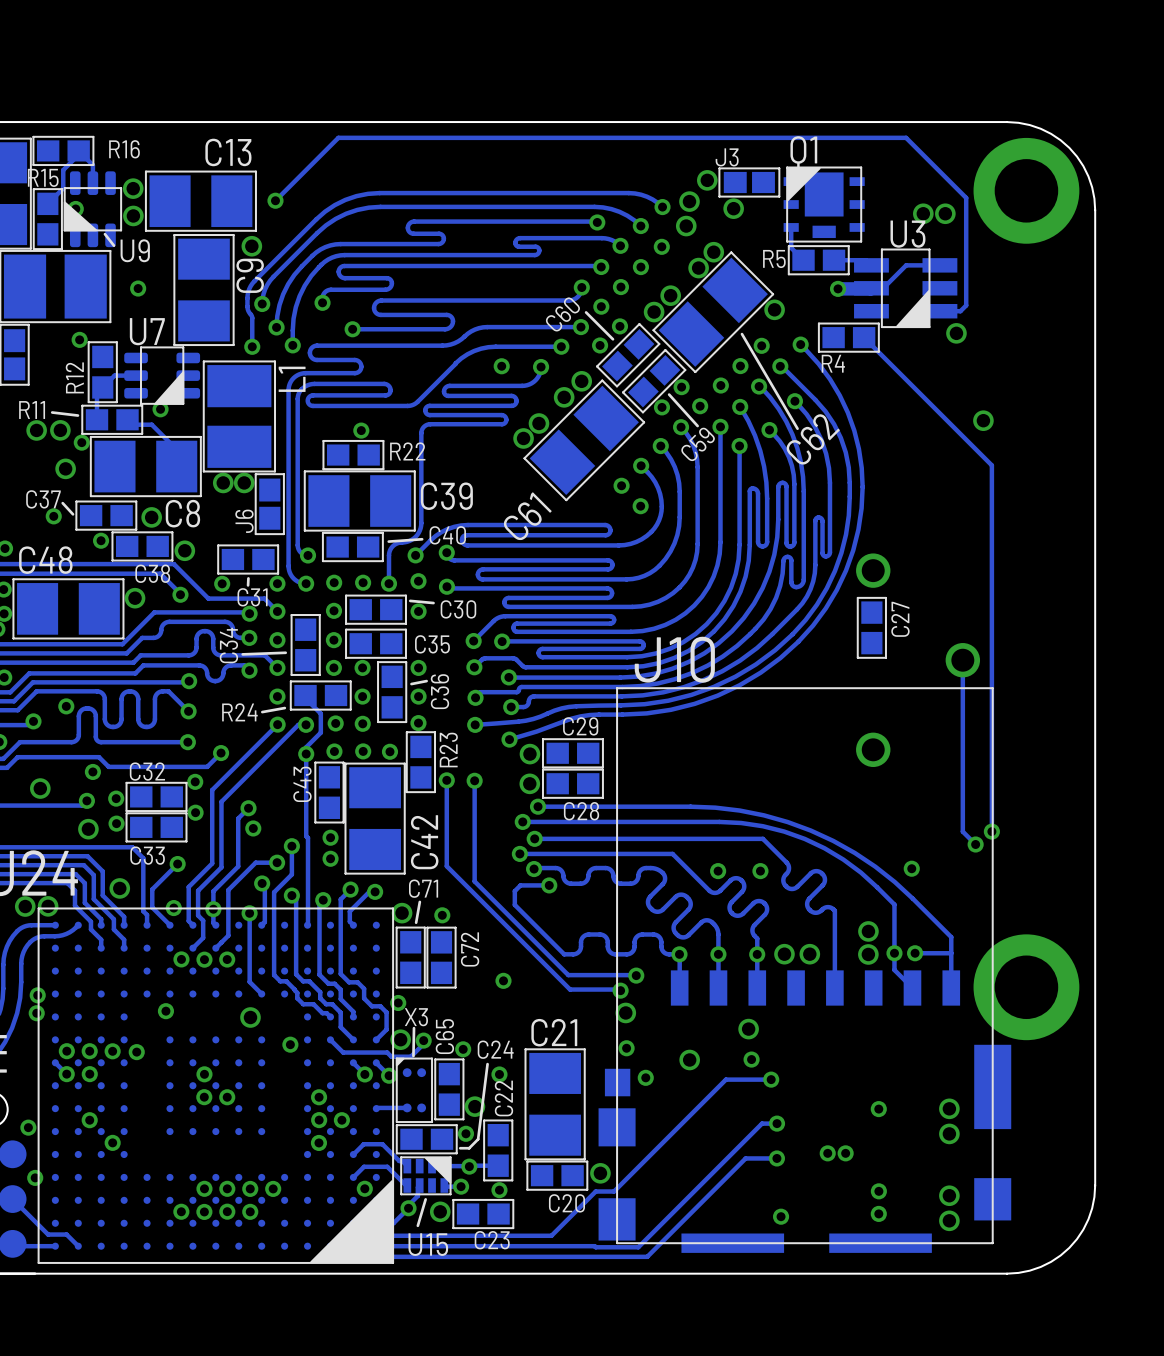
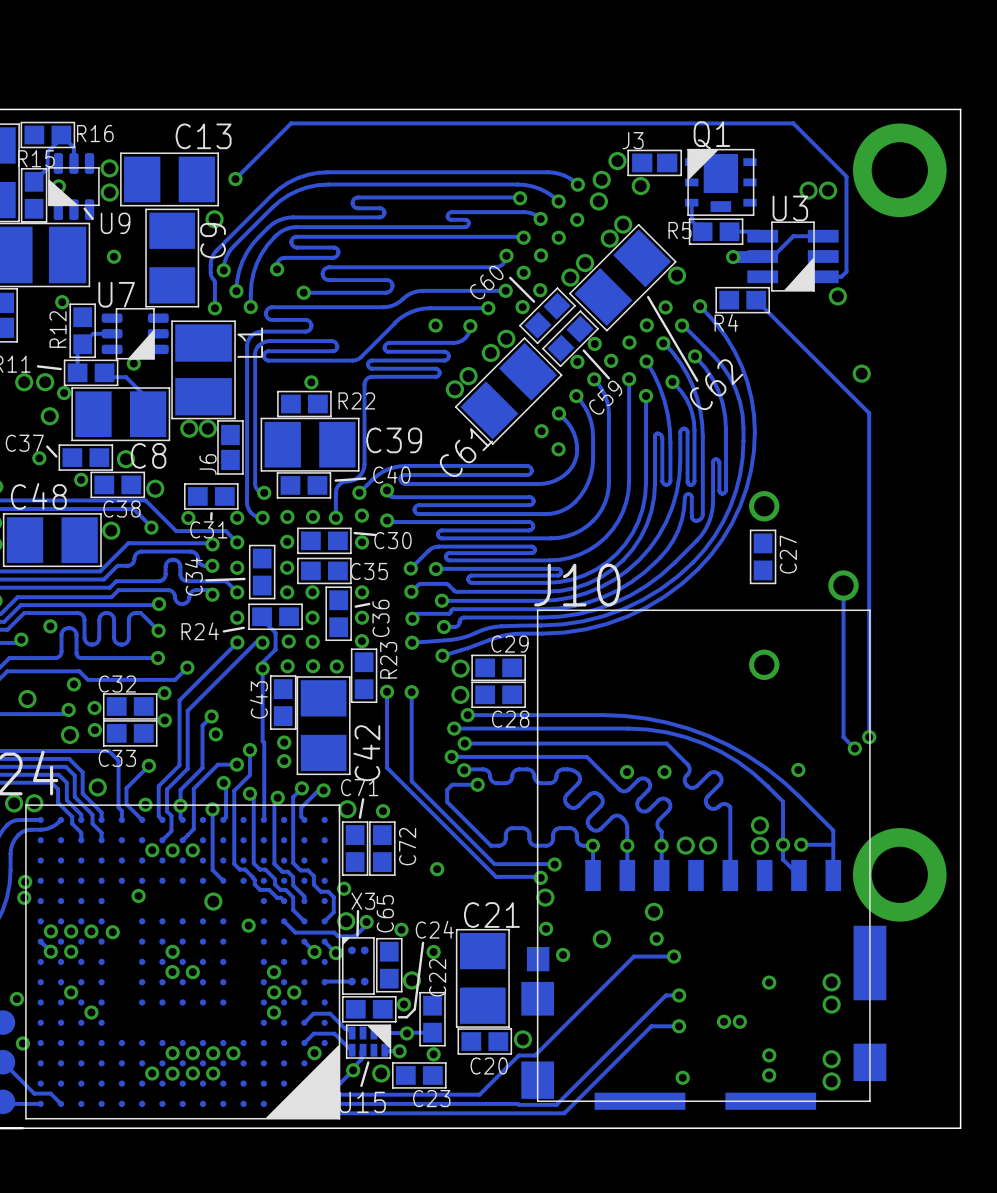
board edge: (1007, 122) (1018, 122) (1040, 128) (1051, 133) (1069, 147) (1083, 166) (1088, 176) (1094, 198) (1095, 210) -> (882, 109) (960, 109) (960, 187)
board edge: (1095, 1185) (1094, 1197) (1088, 1219) (1083, 1229) (1069, 1247) (1051, 1261) (1040, 1266) (1018, 1272) (1007, 1273) -> (960, 1050) (960, 1128) (882, 1128)

